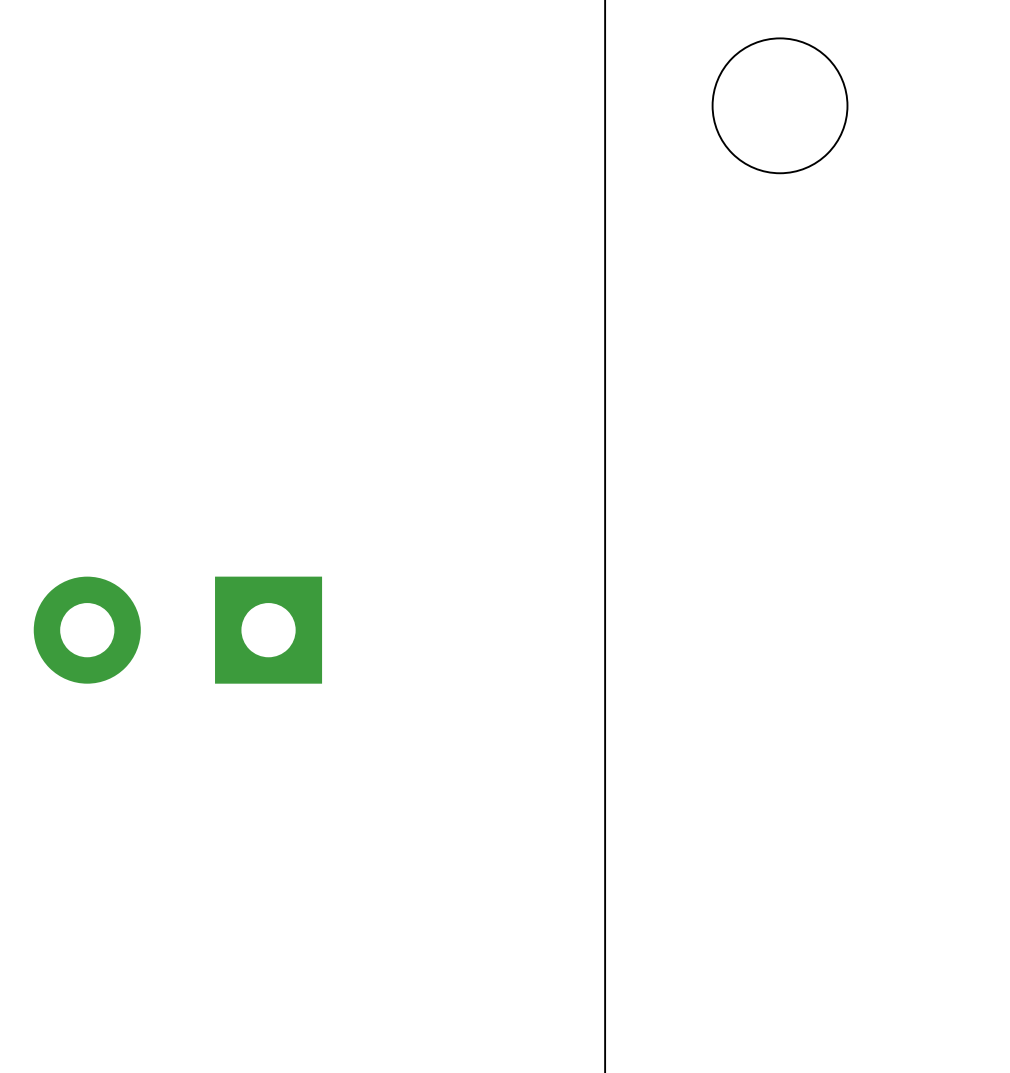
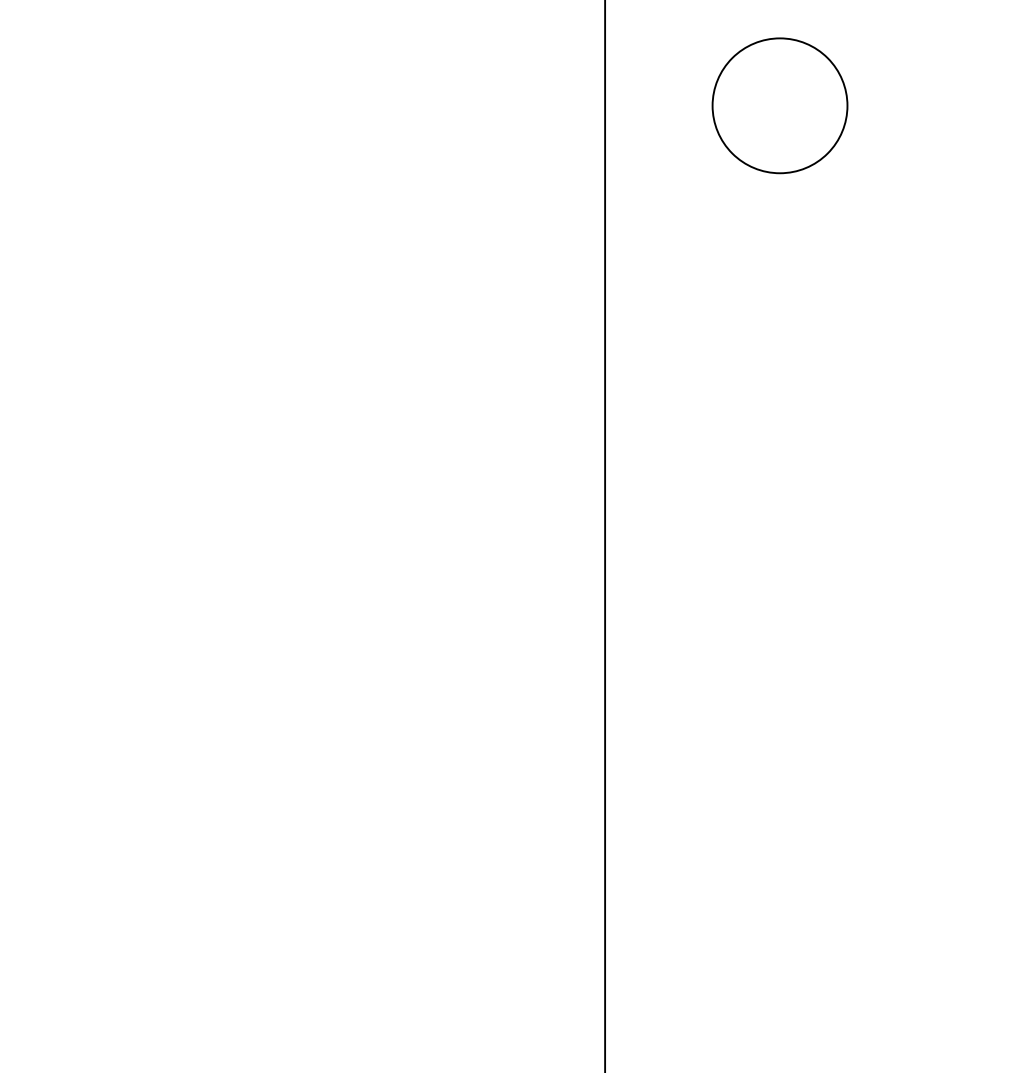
part: (177, 630) -> none

